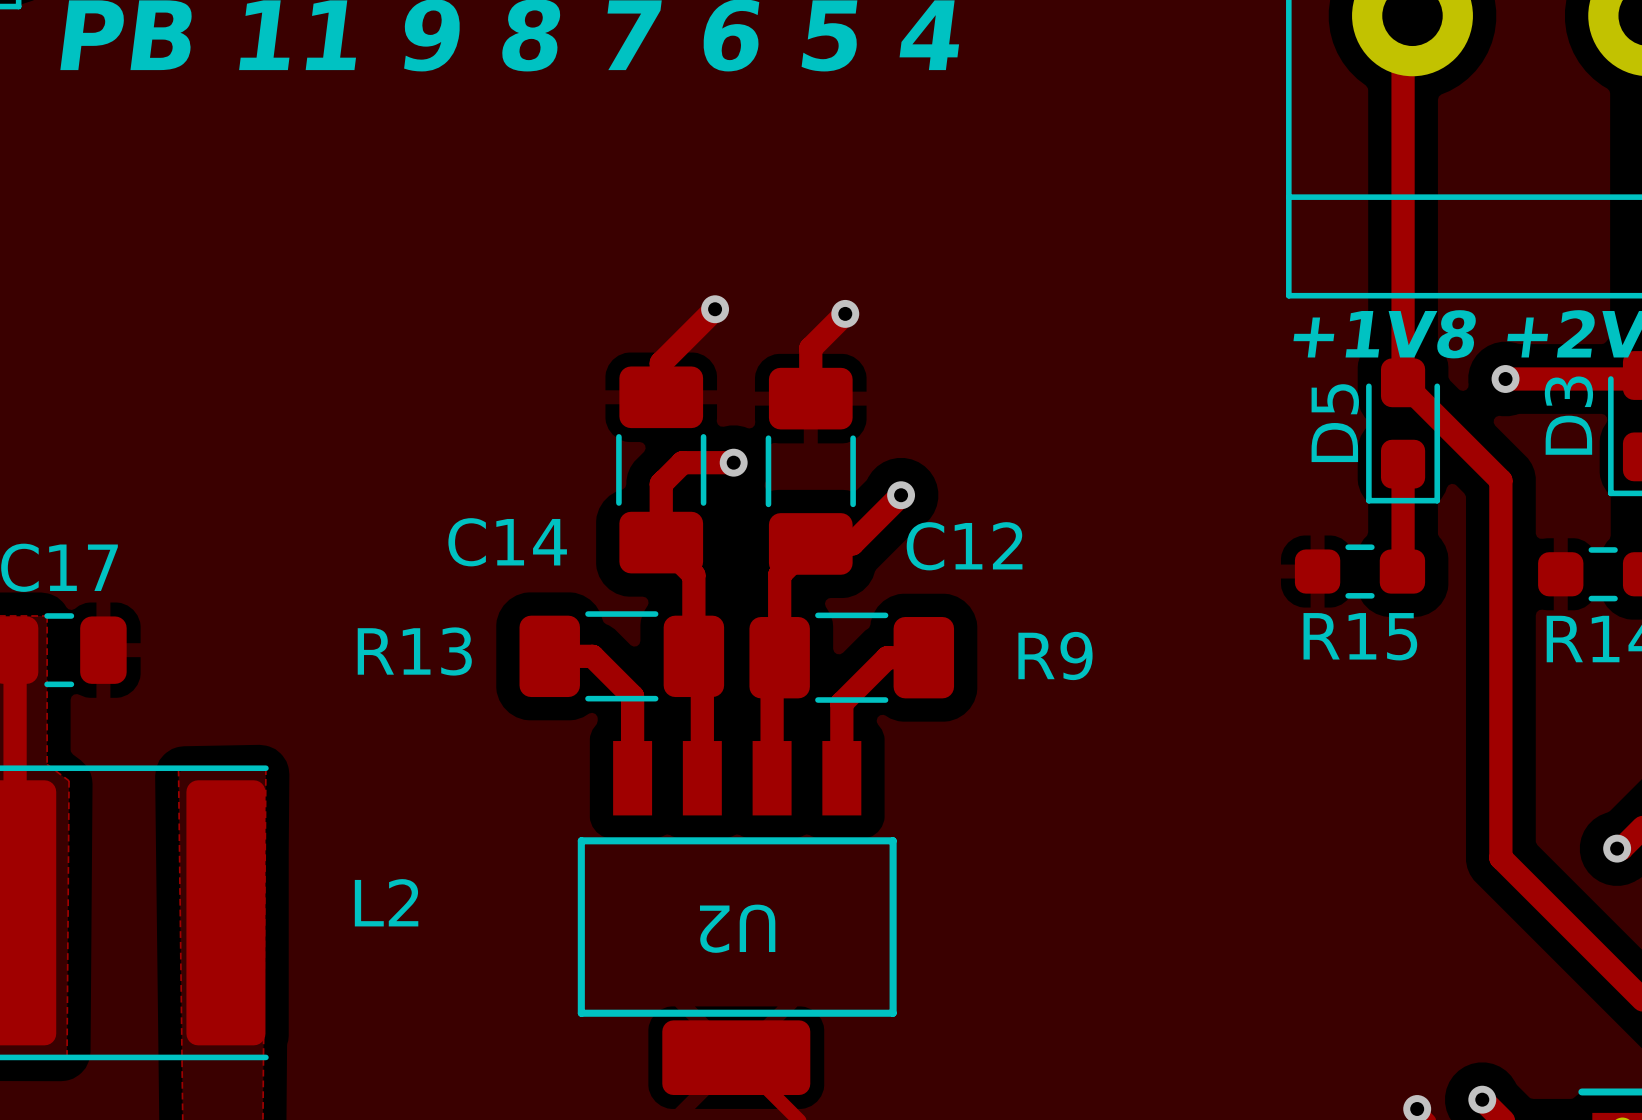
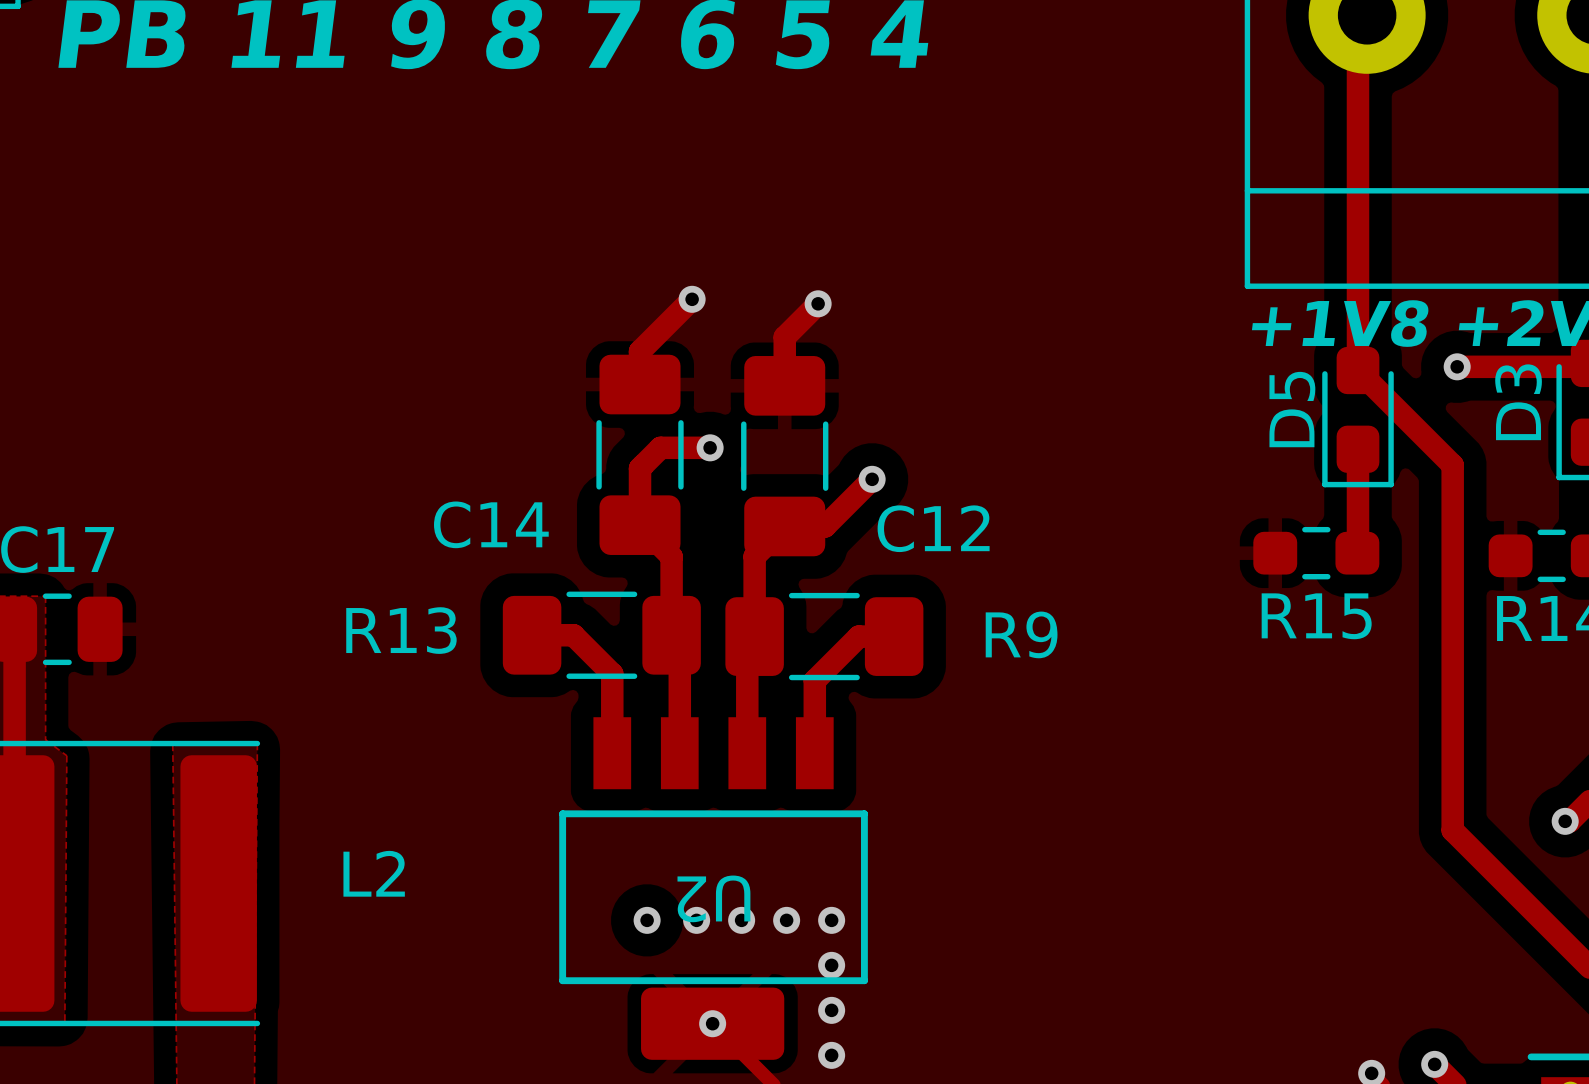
via: none -> (647, 920)
via: none -> (696, 920)
via: none -> (741, 920)
via: none -> (786, 920)
via: none -> (831, 920)
via: none -> (831, 965)
via: none -> (831, 1010)
via: none -> (712, 1023)
via: none -> (831, 1055)

